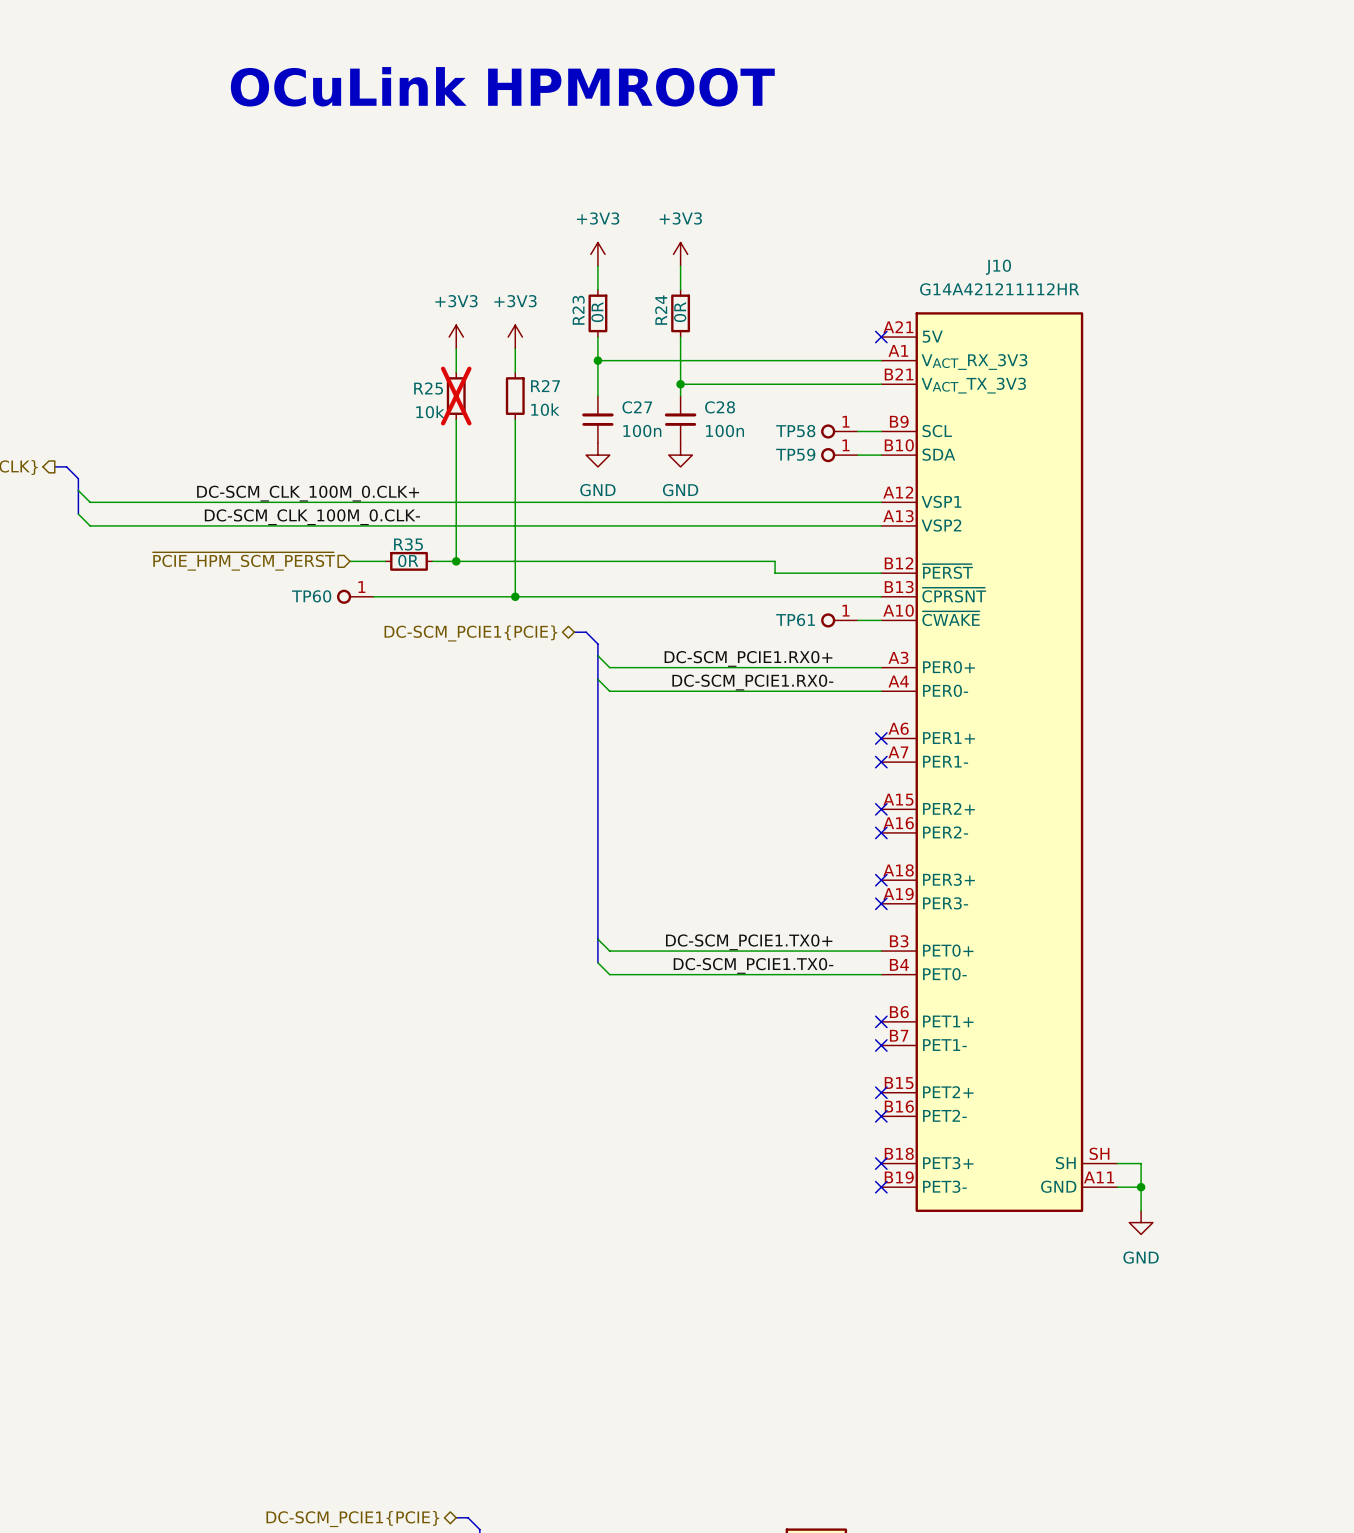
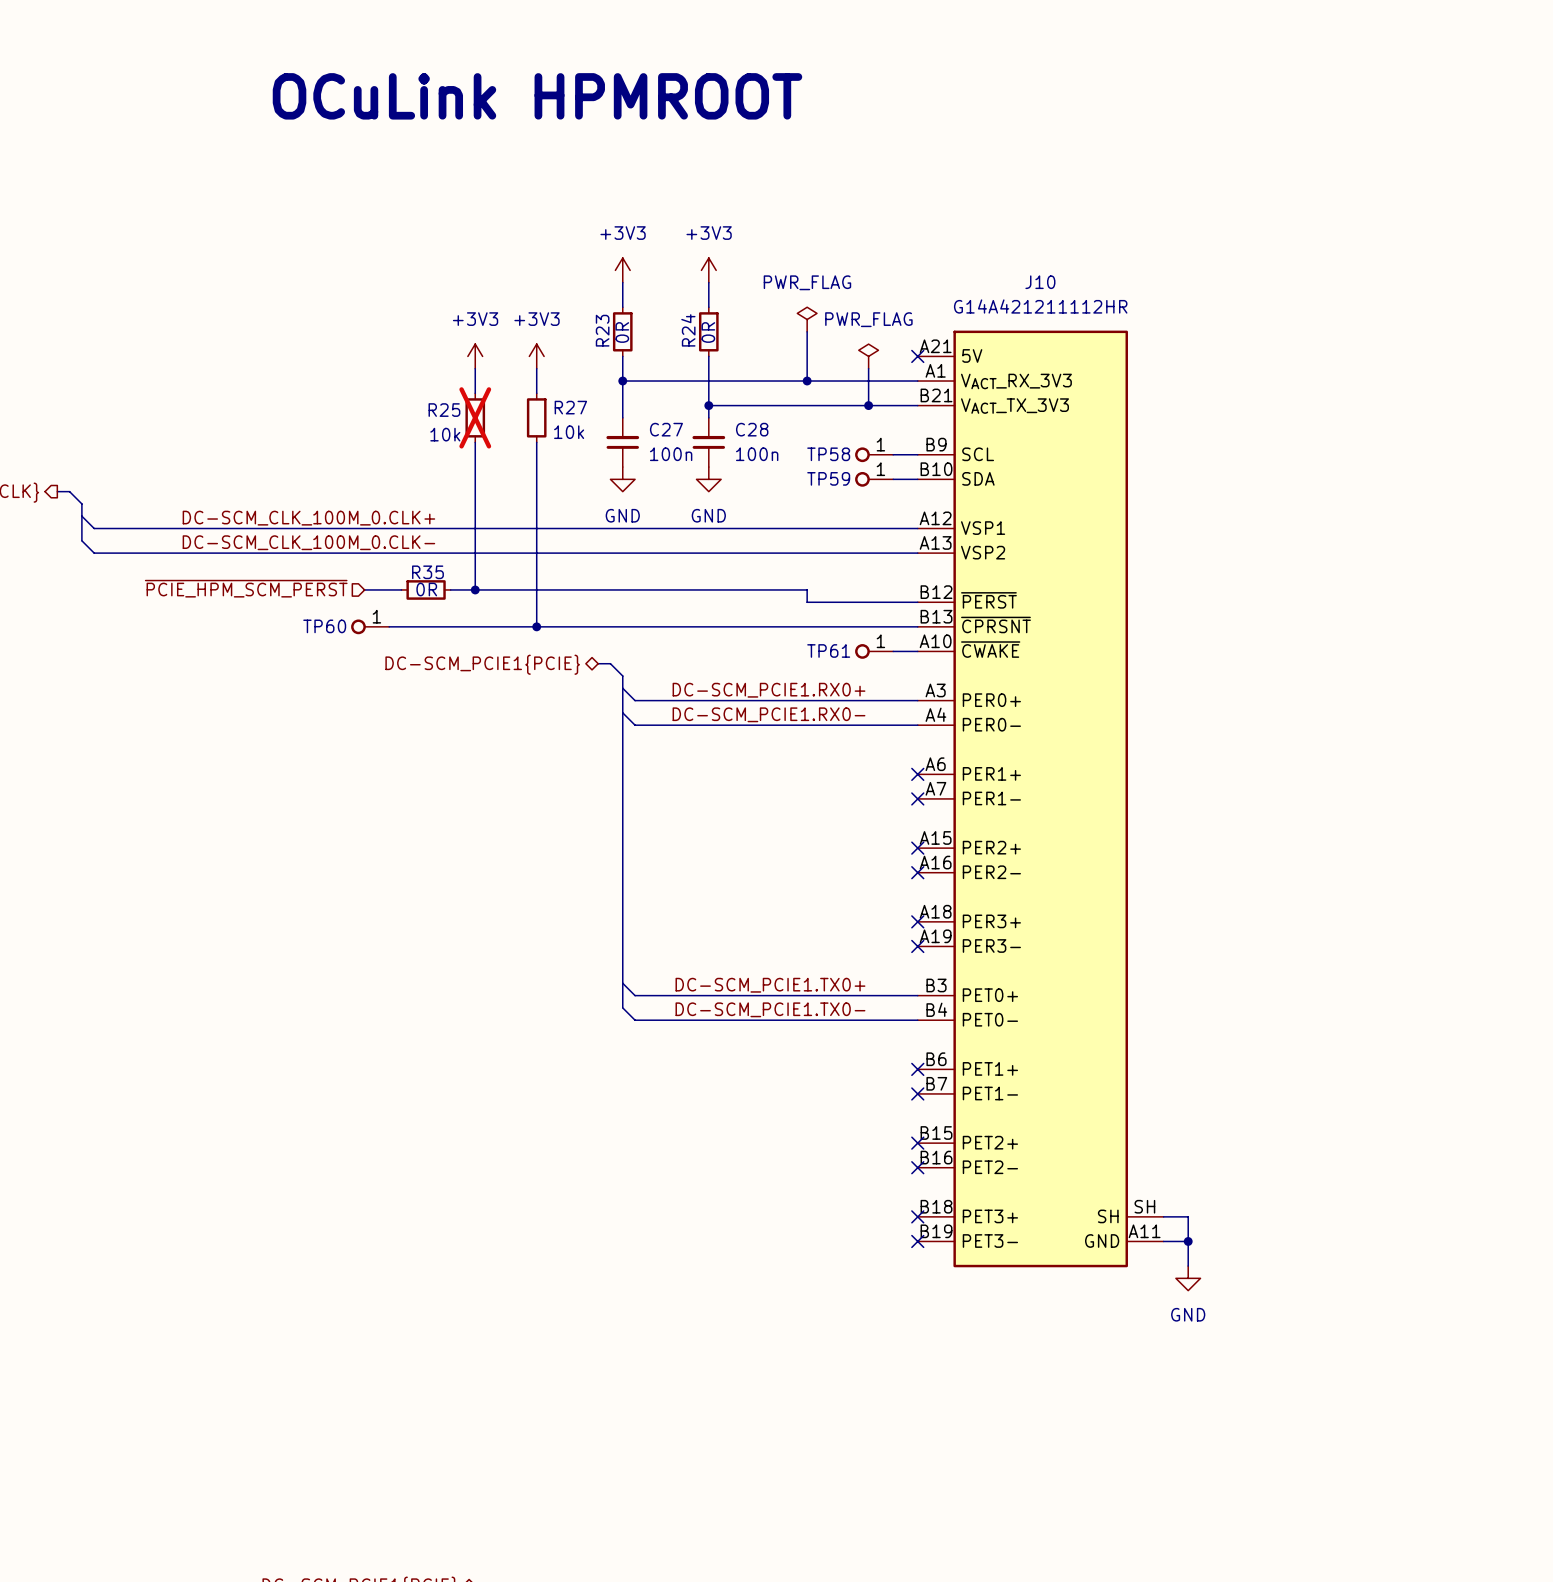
power symbol: none -> PWR_FLAG (807, 319)
wire: none -> (807, 331) (807, 381)
power symbol: none -> PWR_FLAG (868, 356)
wire: none -> (868, 368) (868, 405)
junction: none -> (807, 381)
junction: none -> (868, 405)

